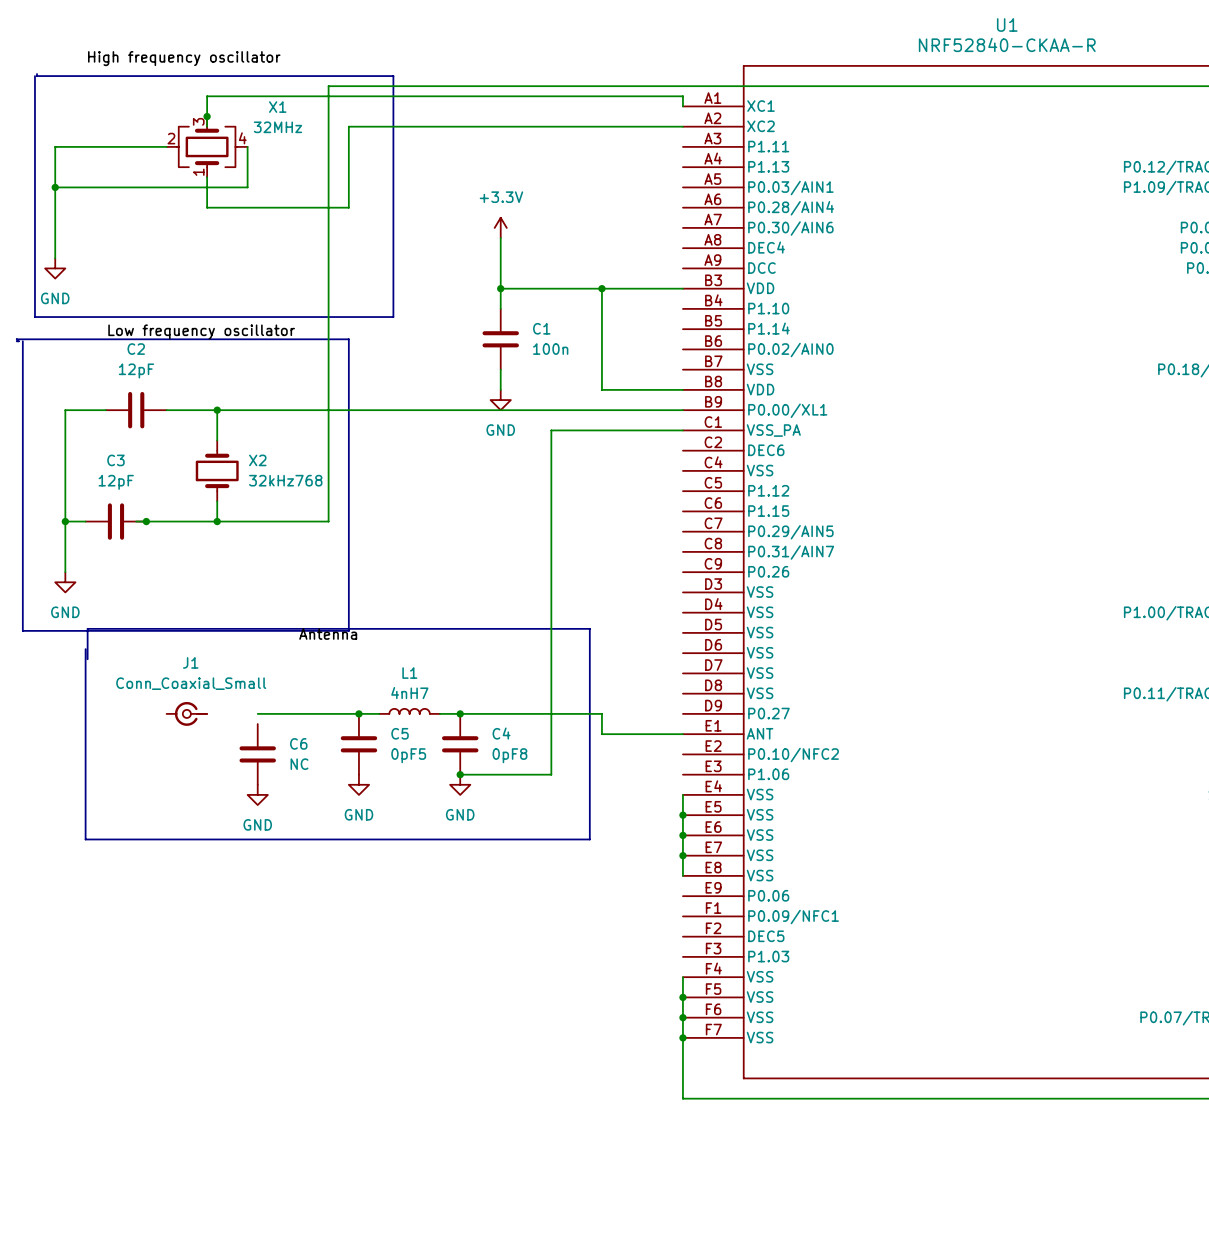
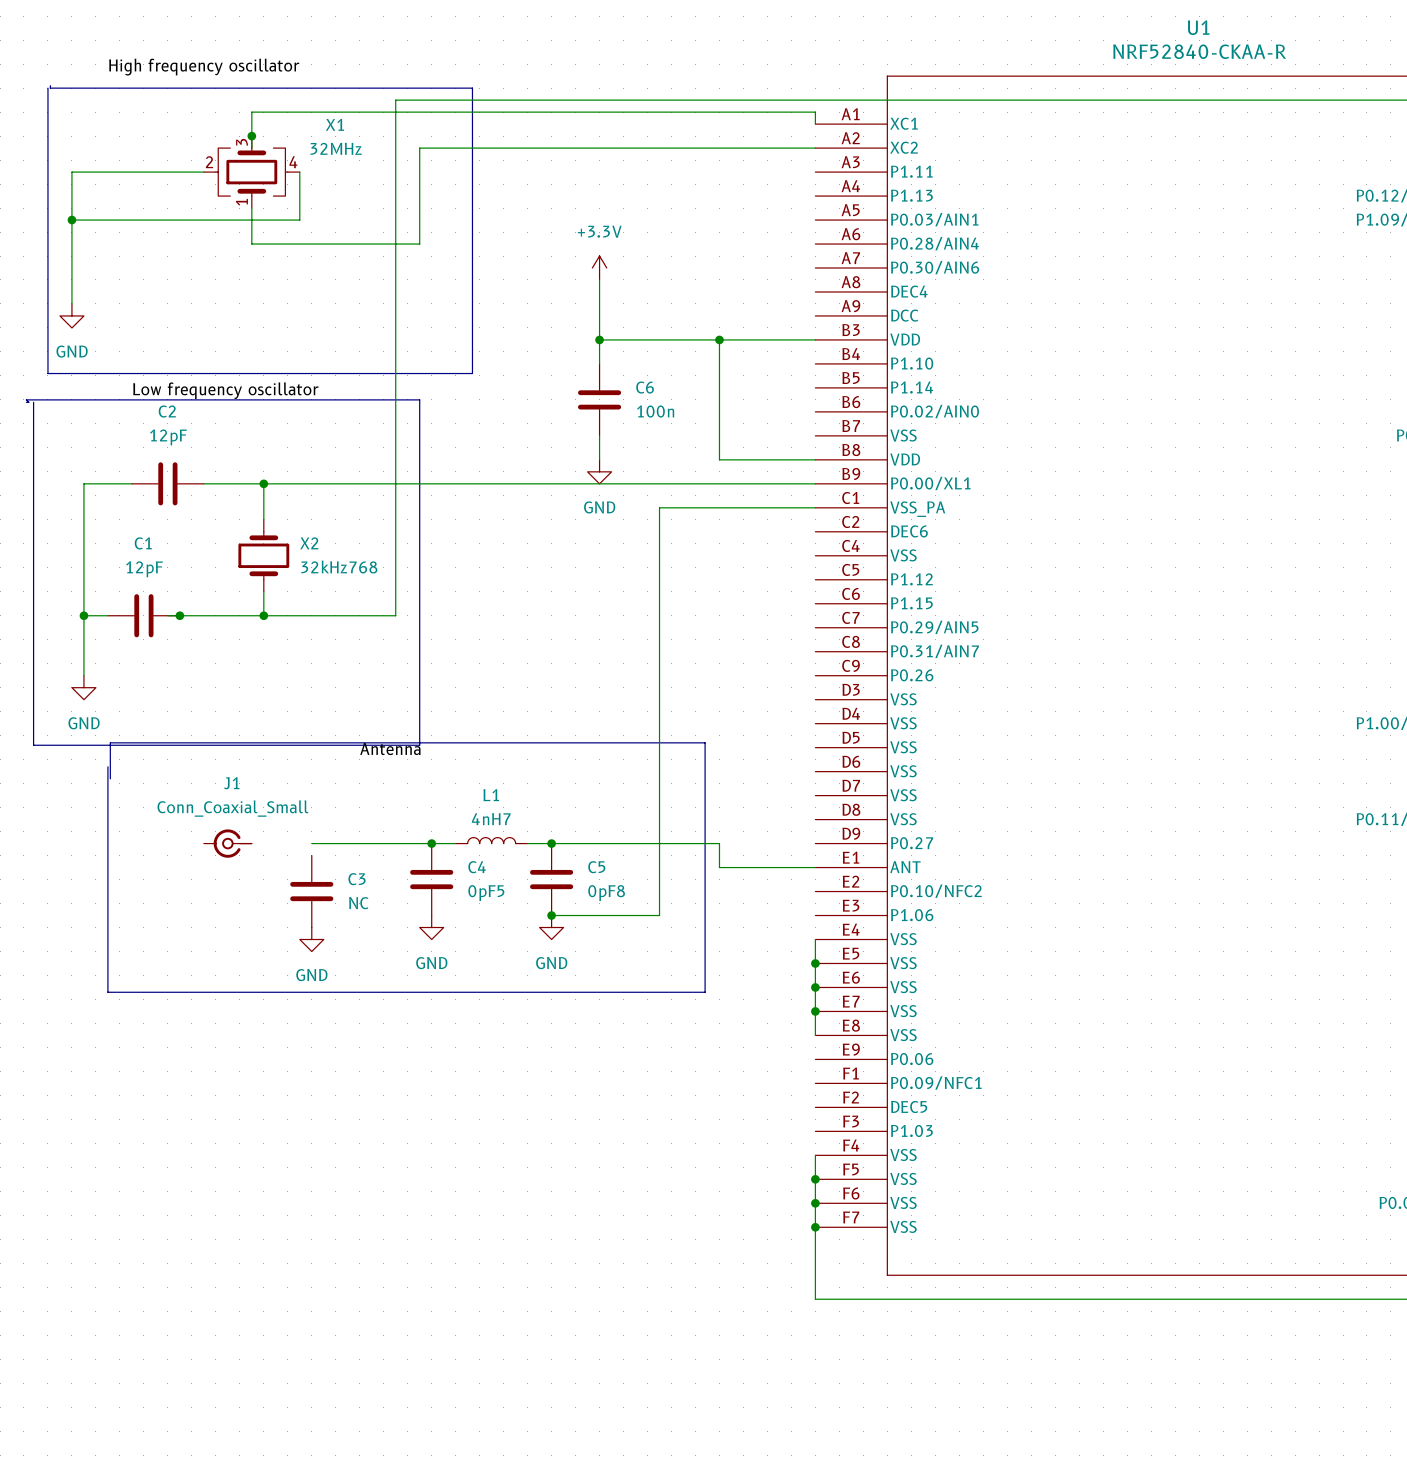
C1 name: C1 (541, 328) -> C6 (645, 387)
C3 name: C3 (115, 460) -> C1 (143, 543)
C5 name: C5 (400, 733) -> C4 (477, 867)
C4 name: C4 (501, 733) -> C5 (596, 867)
C6 name: C6 (298, 743) -> C3 (357, 879)

